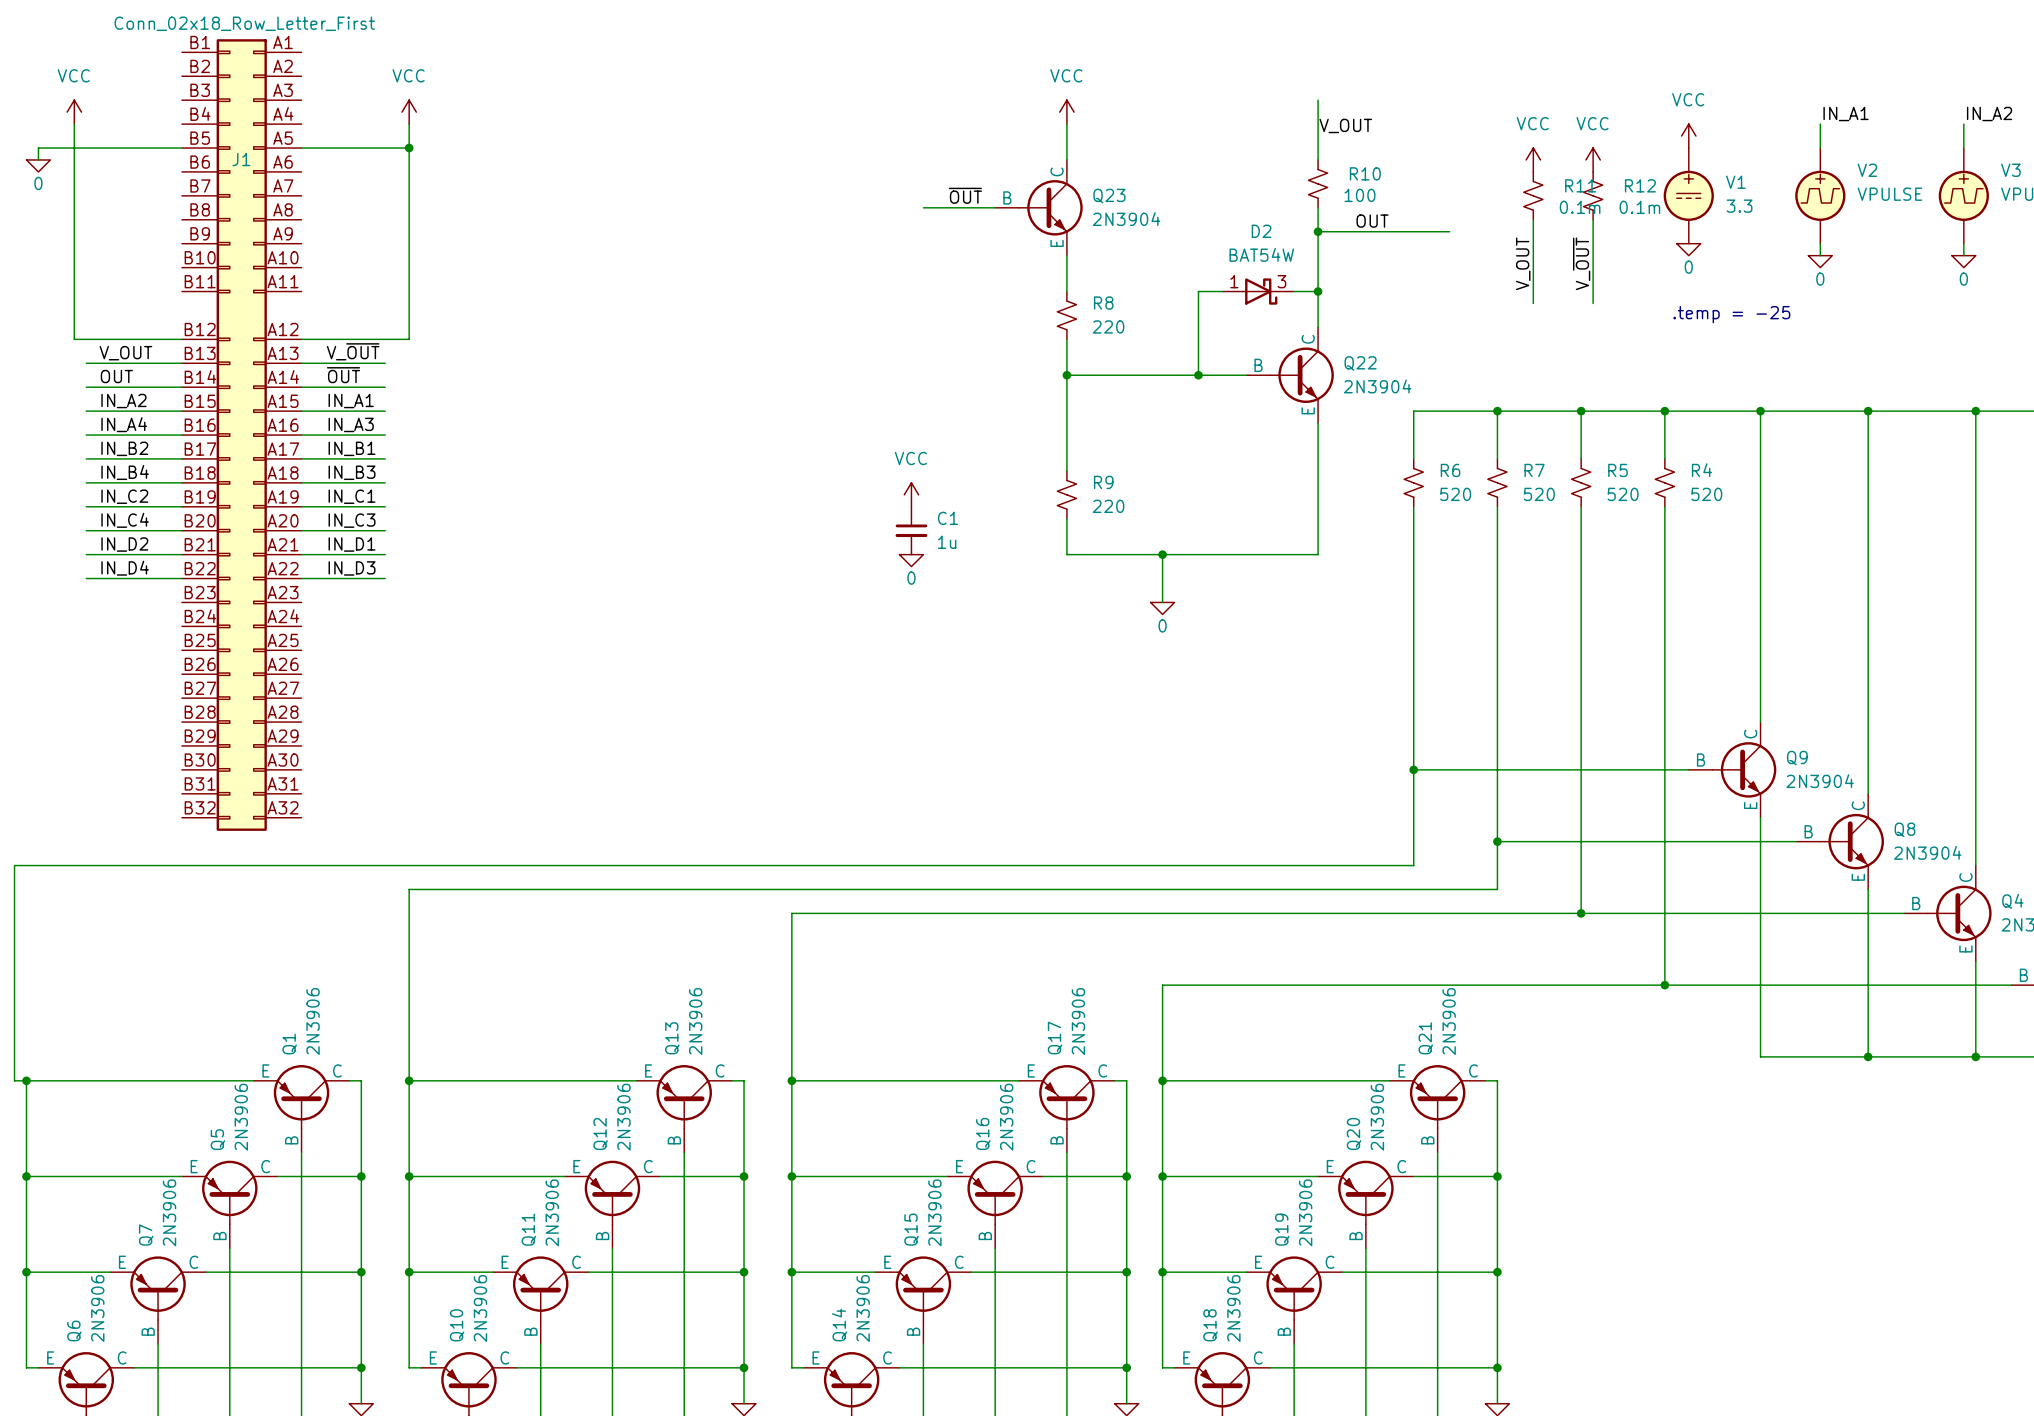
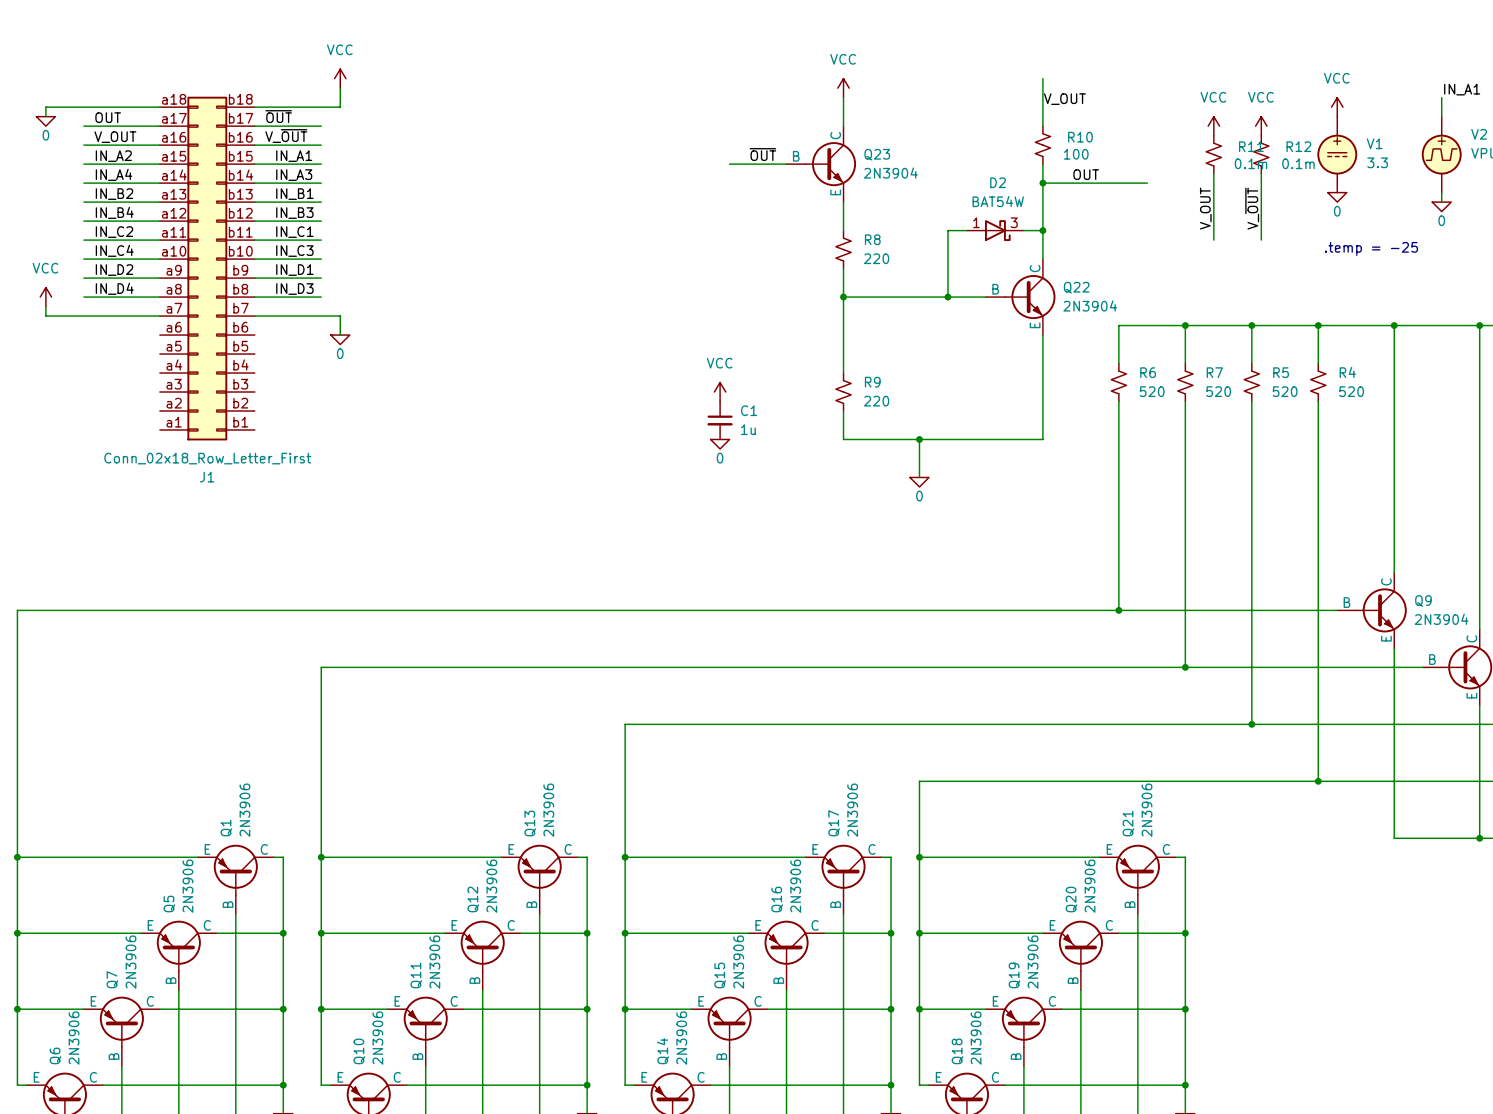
J1 value position: Conn_02x18_Row_Letter_First (244, 23) -> Conn_02x18_Row_Letter_First (207, 458)
J1 symbol: [181, 39, 302, 831] -> [159, 96, 255, 441]
power symbol: VCC (74, 112) -> none
power symbol position: VCC (409, 112) -> VCC (340, 78)
wire: none -> (340, 88) (340, 107) (254, 107)
wire: (74, 124) (74, 339) (181, 339) -> none
wire: (409, 124) (409, 339) (301, 339) -> none
wire: (181, 148) (38, 148) (38, 159) -> (159, 107) (45, 107) (45, 116)
wire: (301, 148) (409, 148) -> none
junction: (409, 148) -> none
J1 name position: J1 (241, 159) -> J1 (207, 477)
power symbol position: 0 (38, 165) -> 0 (45, 121)
label position: V_~{OUT} (353, 351) -> V_~{OUT} (286, 136)
label position: V_OUT (125, 353) -> V_OUT (115, 137)
wire: (86, 363) (181, 363) -> (83, 126) (159, 126)
wire: (301, 363) (385, 363) -> (254, 126) (321, 126)
power symbol: none -> VCC (45, 297)
label position: ~{OUT} (343, 375) -> ~{OUT} (278, 116)
label position: OUT (116, 376) -> OUT (108, 117)
wire: none -> (45, 306) (45, 316) (159, 316)
wire: (86, 387) (181, 387) -> (83, 145) (159, 145)
wire: (301, 387) (385, 387) -> (254, 145) (321, 145)
wire: none -> (254, 316) (340, 316) (340, 335)
label position: IN_A2 (123, 401) -> IN_A2 (113, 156)
label position: IN_A1 (351, 401) -> IN_A1 (294, 156)
wire: (86, 411) (181, 411) -> (83, 164) (159, 164)
wire: (301, 411) (385, 411) -> (254, 164) (321, 164)
label position: IN_A4 (124, 424) -> IN_A4 (114, 174)
label position: IN_A3 (351, 424) -> IN_A3 (294, 175)
power symbol: none -> 0 (340, 339)
wire: (86, 435) (181, 435) -> (83, 183) (159, 183)
wire: (301, 435) (385, 435) -> (254, 183) (321, 183)
label position: IN_B2 (124, 448) -> IN_B2 (114, 194)
label position: IN_B1 (352, 448) -> IN_B1 (294, 194)
wire: (86, 458) (181, 458) -> (83, 202) (159, 202)
wire: (301, 458) (385, 458) -> (254, 202) (321, 202)
label position: IN_B4 (125, 472) -> IN_B4 (114, 212)
label position: IN_B3 (352, 472) -> IN_B3 (294, 213)
wire: (86, 482) (181, 482) -> (83, 221) (159, 221)
wire: (301, 482) (385, 482) -> (254, 221) (321, 221)
label position: IN_C2 (124, 496) -> IN_C2 (114, 232)
label position: IN_C1 (352, 496) -> IN_C1 (294, 232)
wire: (86, 506) (181, 506) -> (83, 240) (159, 240)
wire: (301, 506) (385, 506) -> (254, 240) (321, 240)
label position: IN_C4 (125, 520) -> IN_C4 (114, 250)
label position: IN_C3 (352, 520) -> IN_C3 (294, 251)
wire: (86, 530) (181, 530) -> (83, 259) (159, 259)
wire: (301, 530) (385, 530) -> (254, 259) (321, 259)
label position: IN_D2 (124, 544) -> IN_D2 (114, 270)
label position: IN_D1 (352, 544) -> IN_D1 (294, 270)
wire: (86, 554) (181, 554) -> (83, 278) (159, 278)
wire: (301, 554) (385, 554) -> (254, 278) (321, 278)
label position: IN_D4 (125, 568) -> IN_D4 (114, 288)
label position: IN_D3 (352, 568) -> IN_D3 (294, 289)
wire: (86, 578) (181, 578) -> (83, 297) (159, 297)
wire: (301, 578) (385, 578) -> (254, 297) (321, 297)
wire: (1413, 769) (1413, 865) (14, 865) (14, 1080) (26, 1080) -> (1118, 610) (17, 610) (17, 857)
wire: (1497, 841) (1497, 889) (409, 889) -> (1185, 667) (321, 667) (321, 705)

